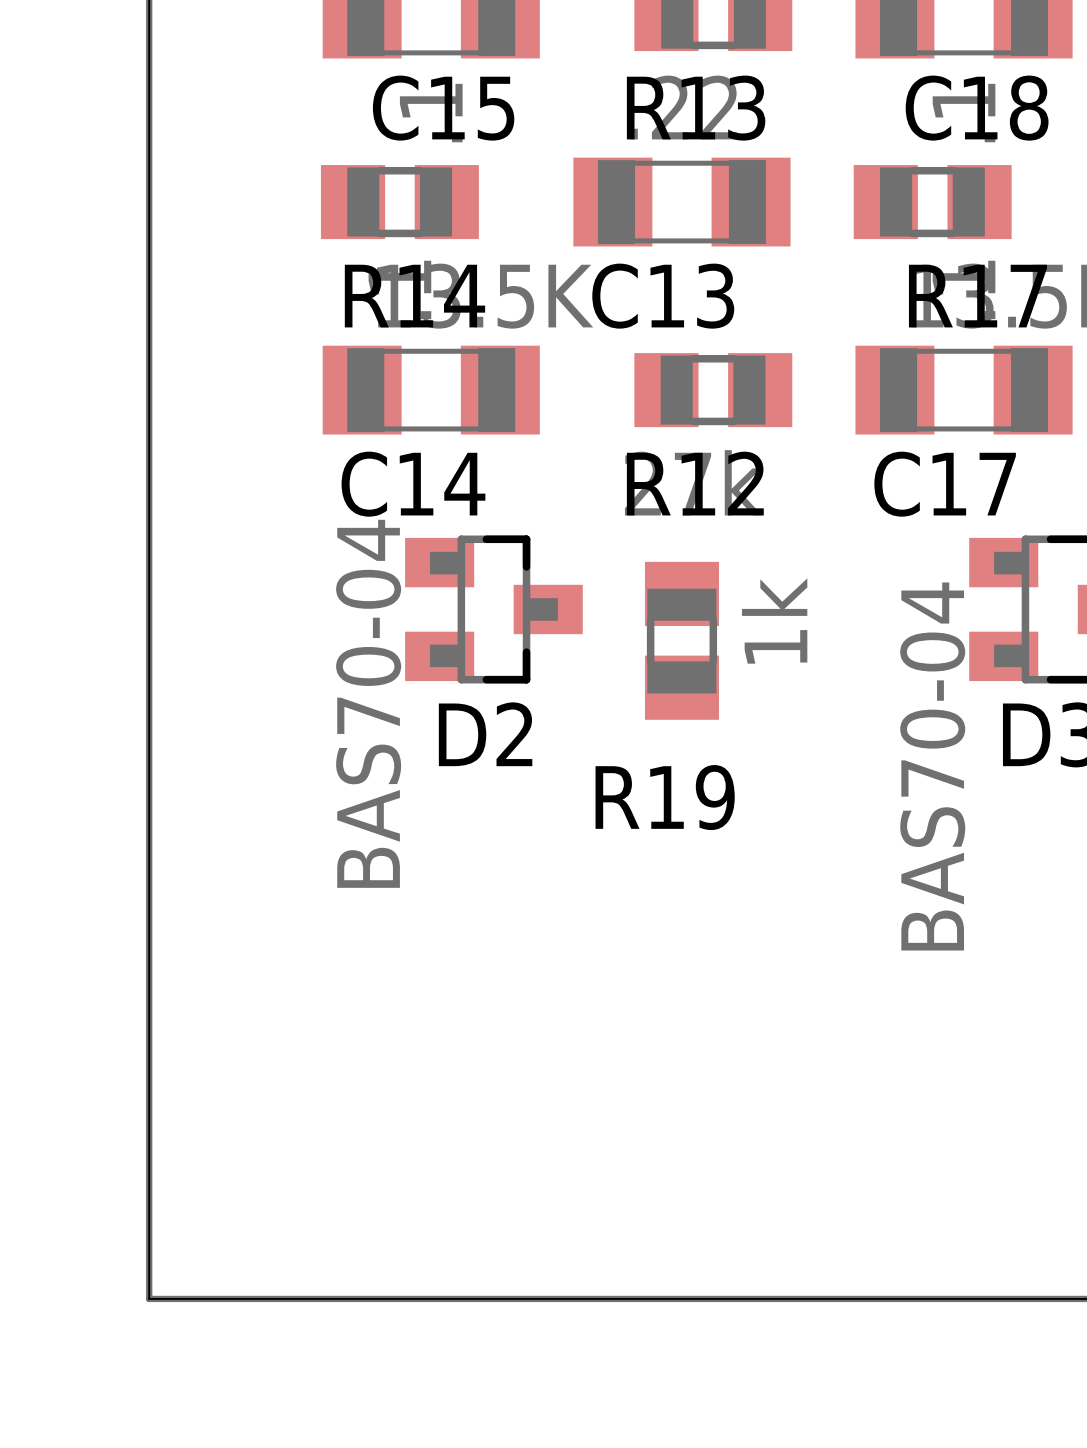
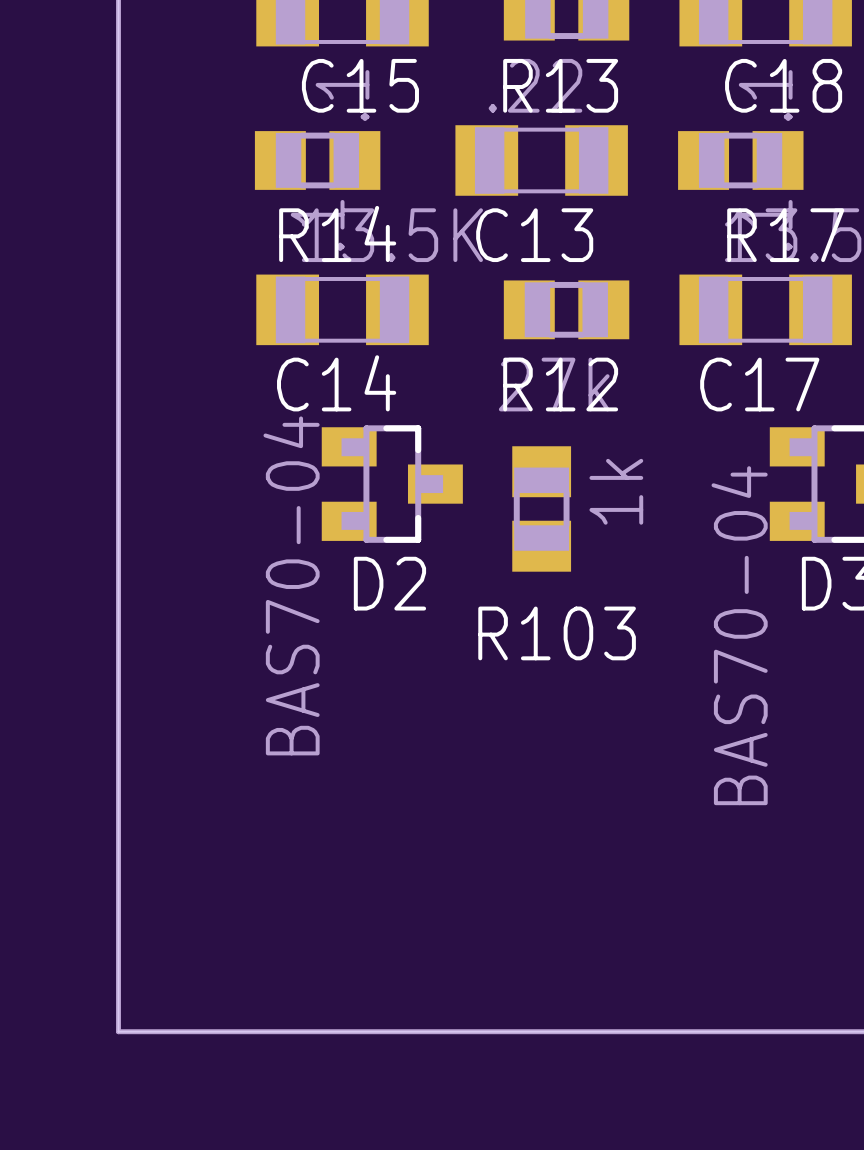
R19 name: R19 (665, 797) -> R103 (557, 633)

